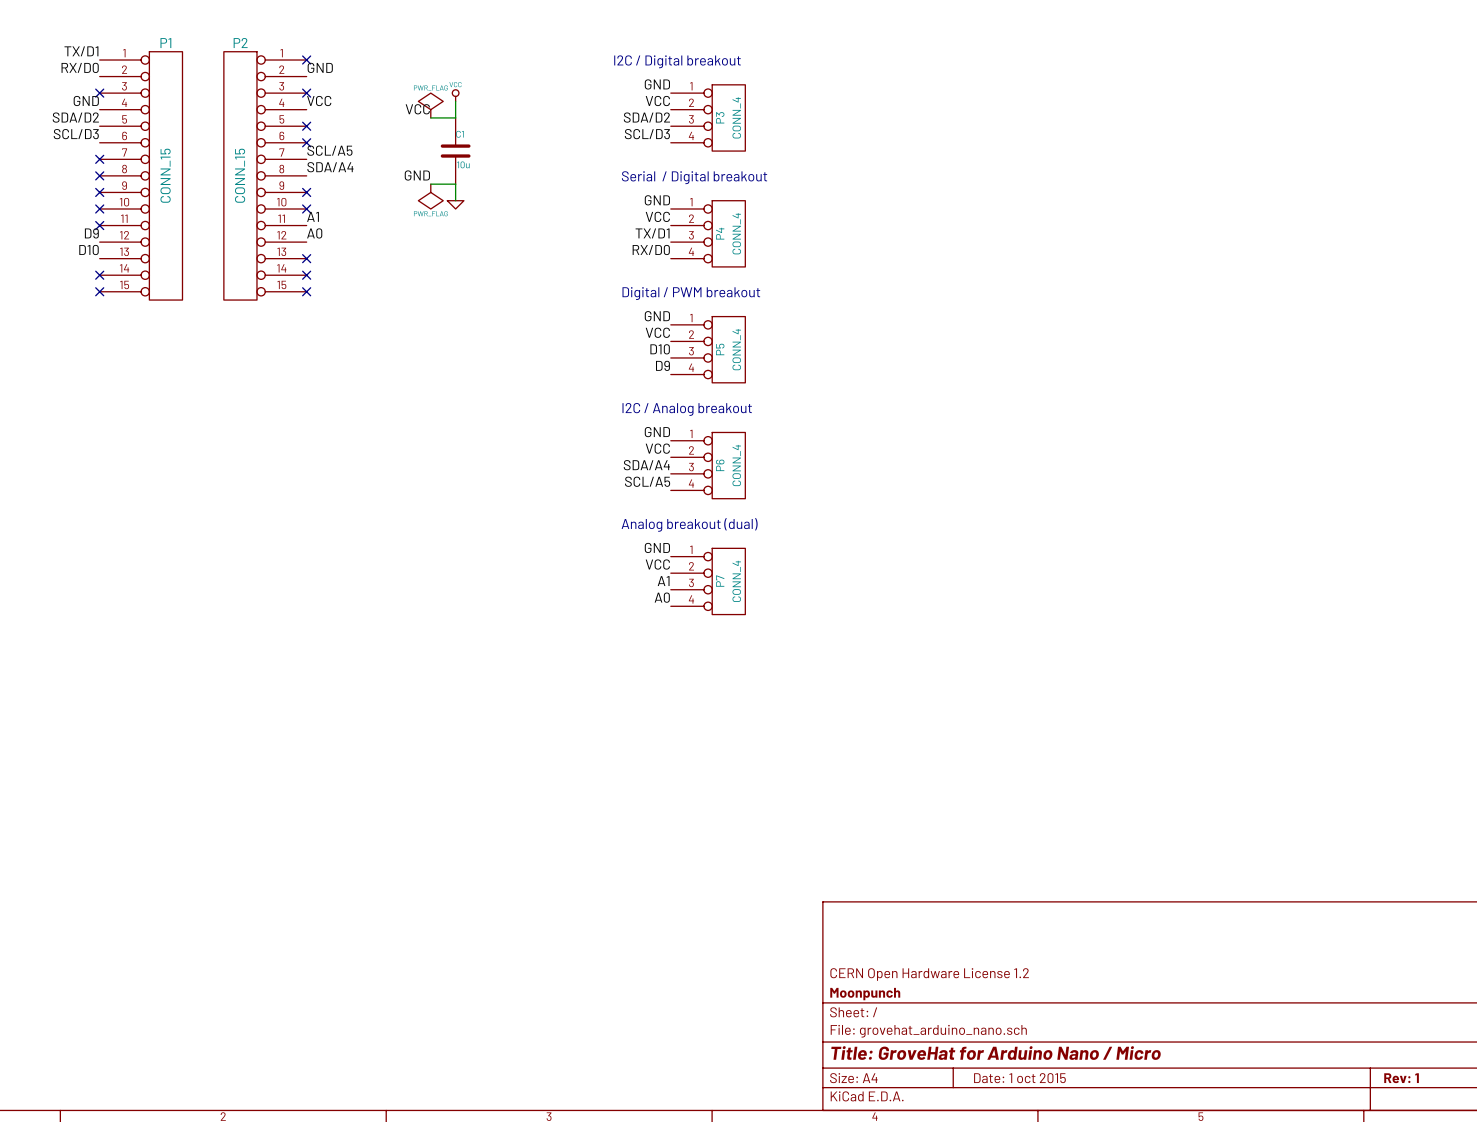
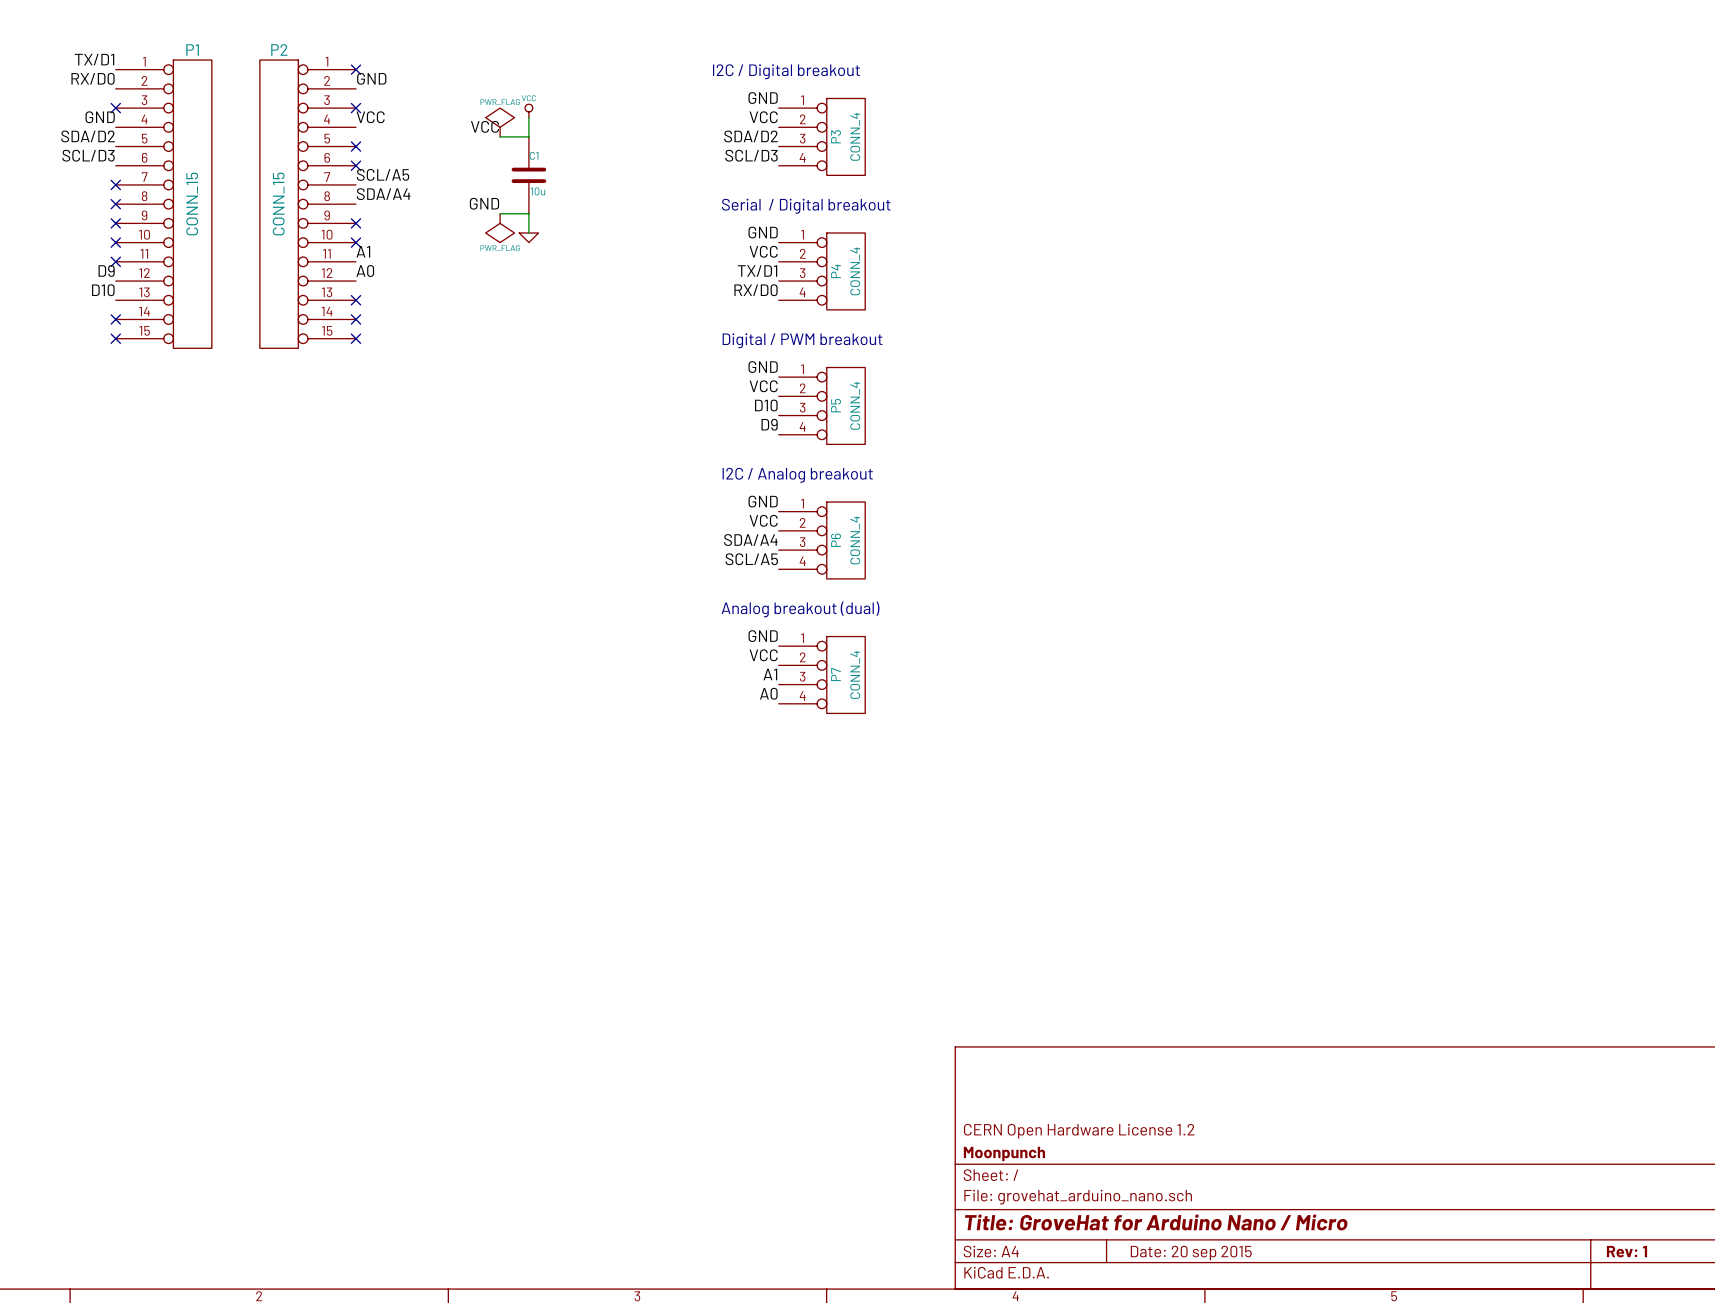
title block: Date: 1 oct 2015 (1019, 1078) -> Date: 20 sep 2015 (1191, 1253)

